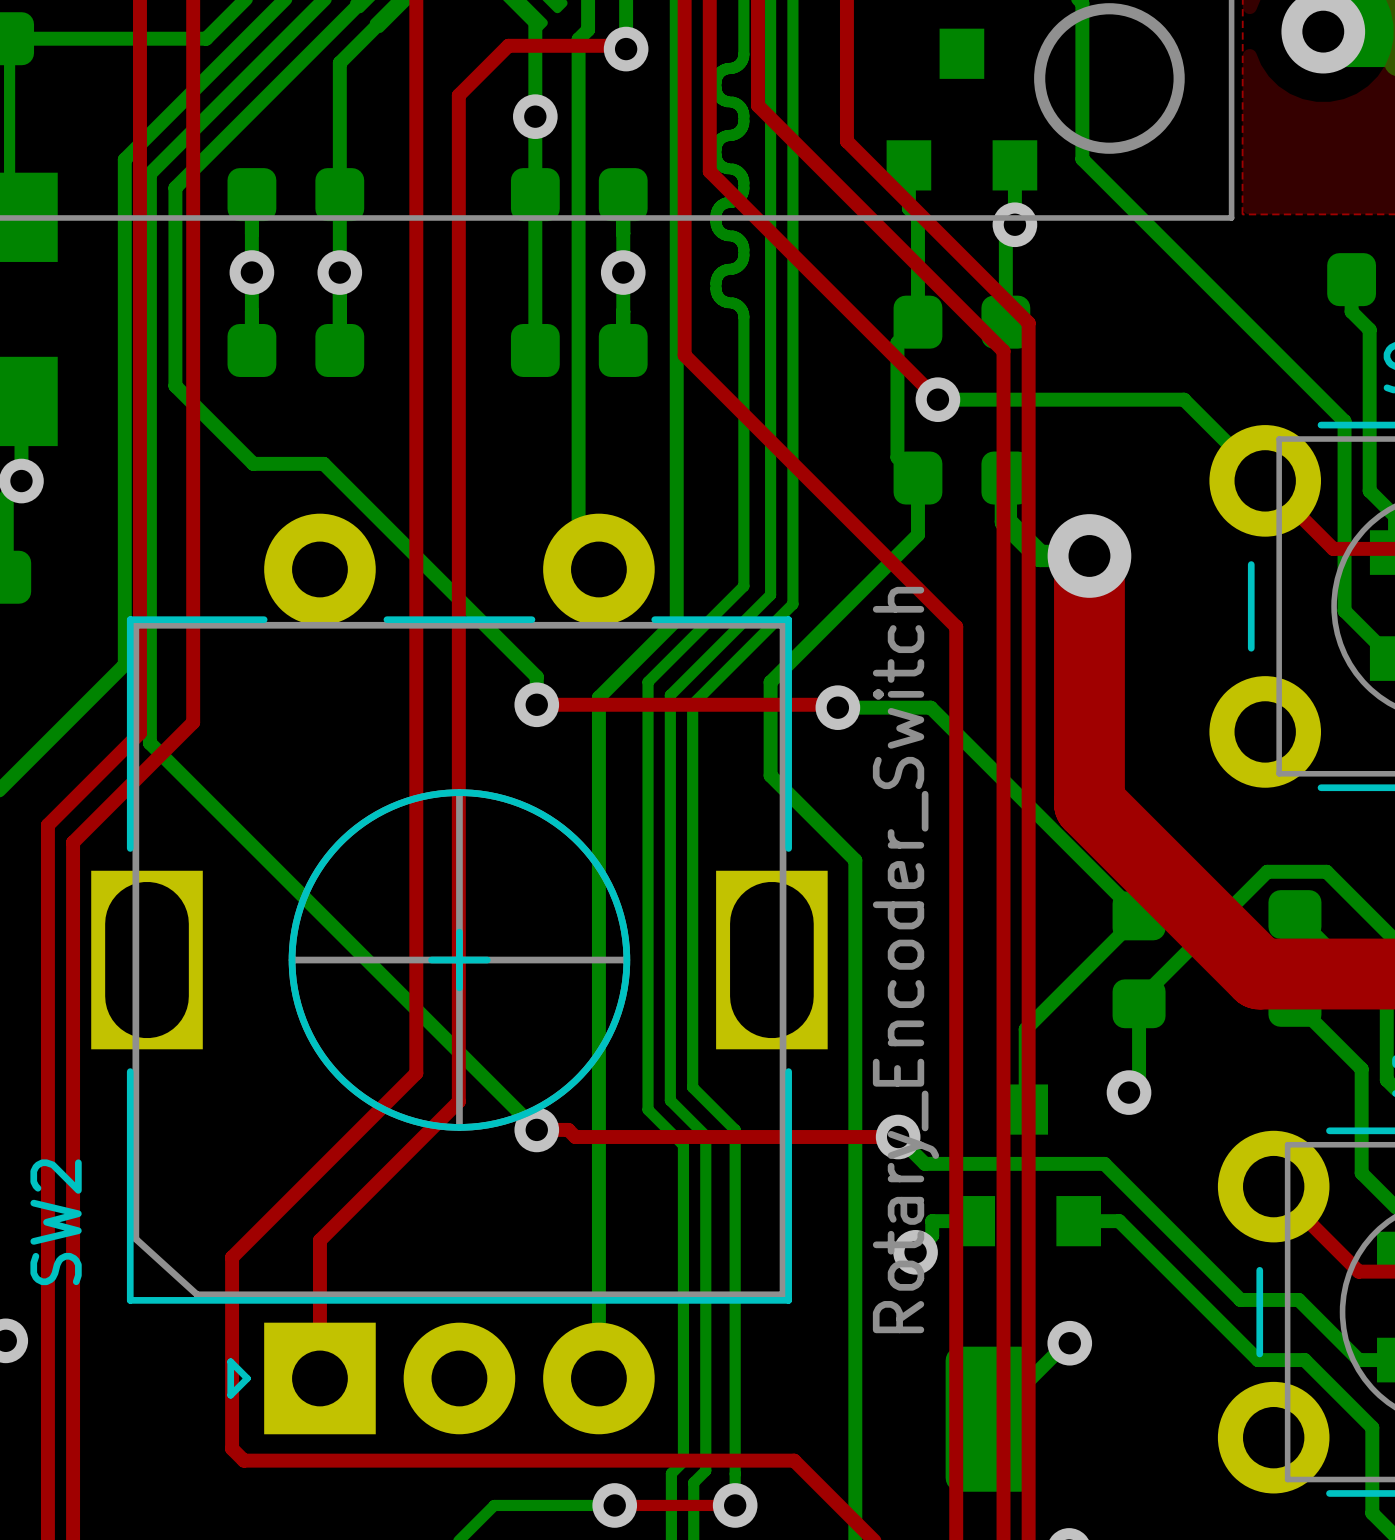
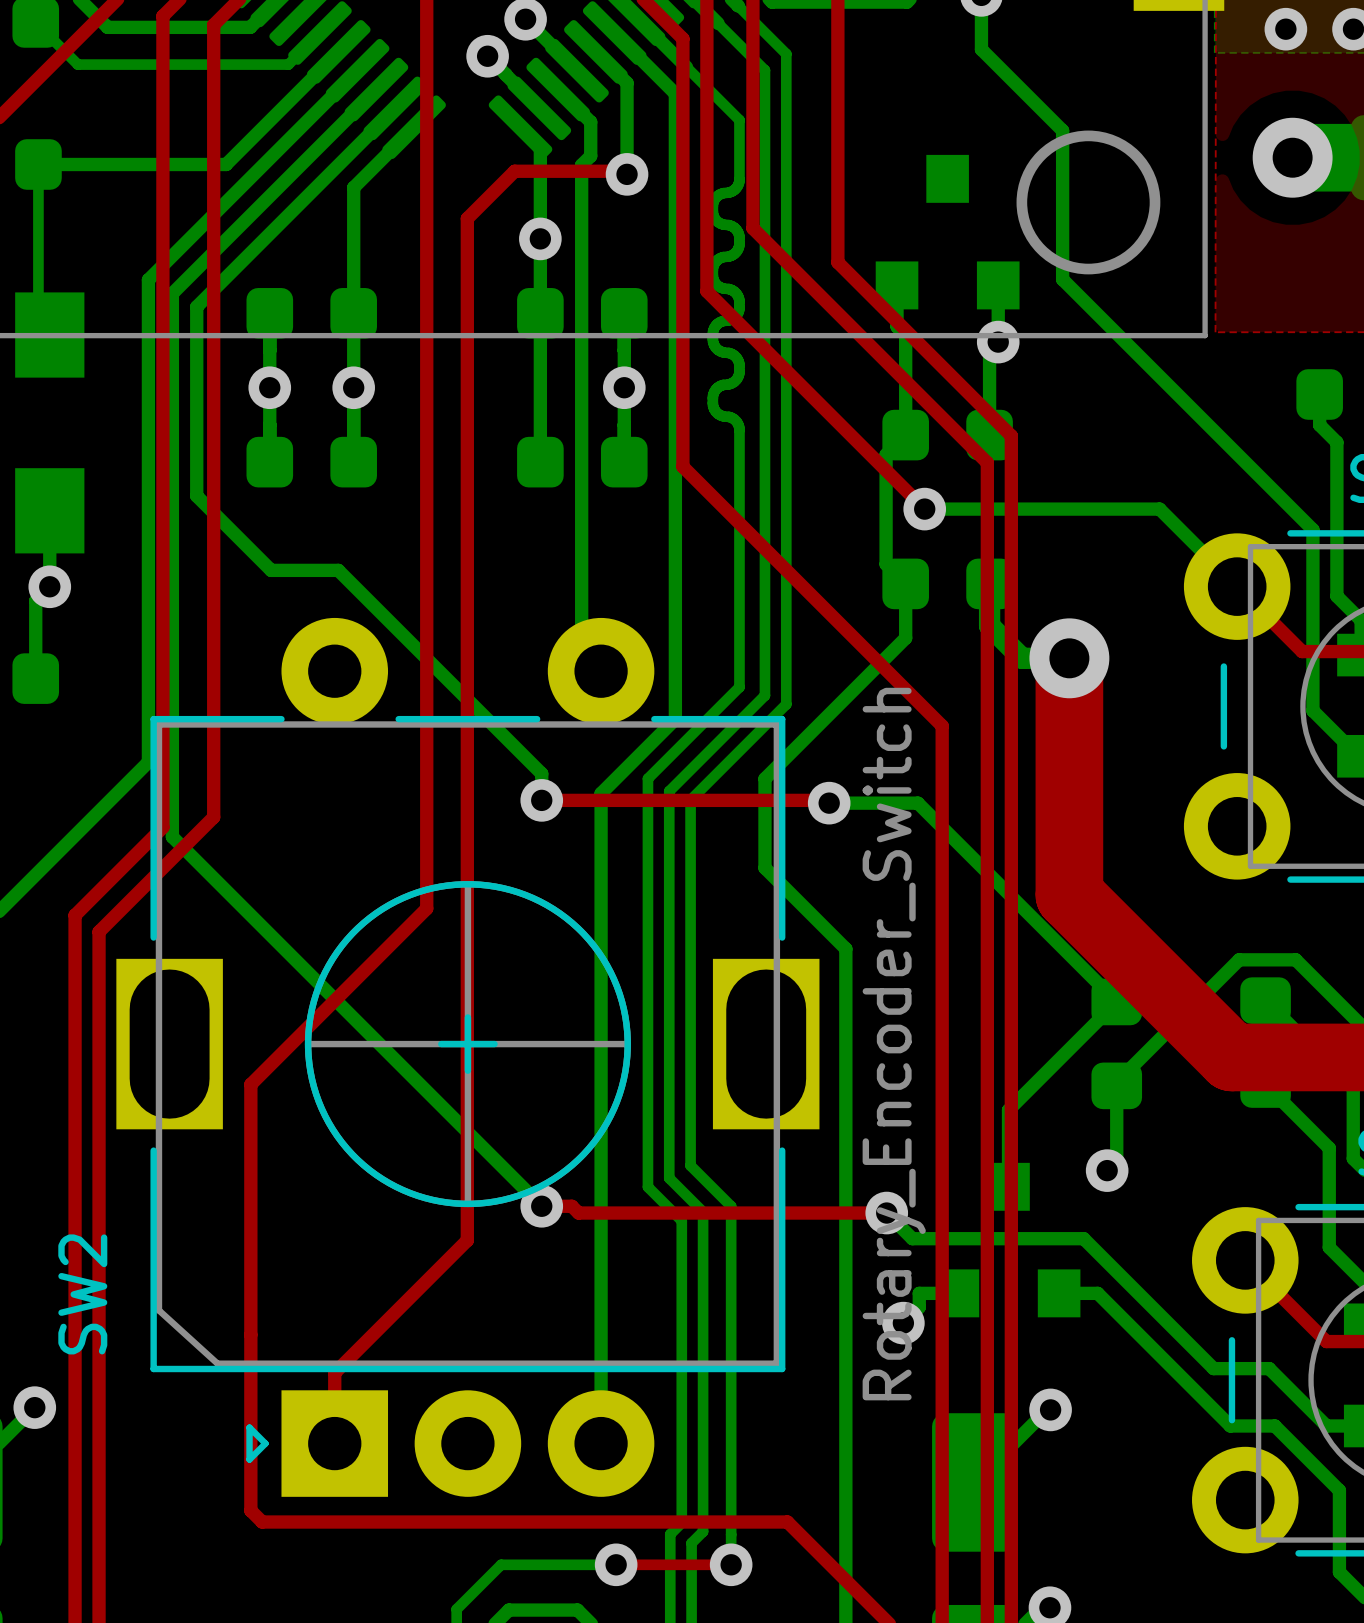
top track: (416, 818) (416, 1073) (232, 1257) -> (426, 908) (250, 1084) (250, 1328)
top track: (458, 1101) (319, 1240) (319, 1304) -> (467, 1179) (467, 1240) (334, 1372)

